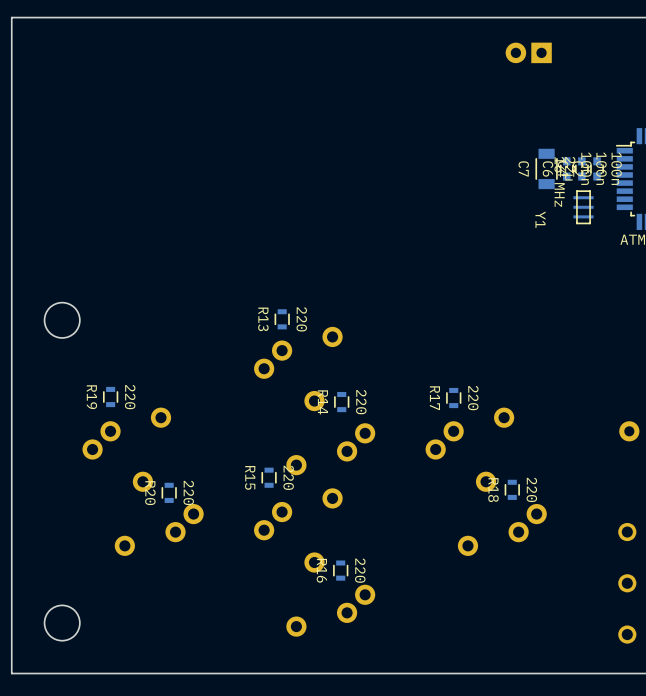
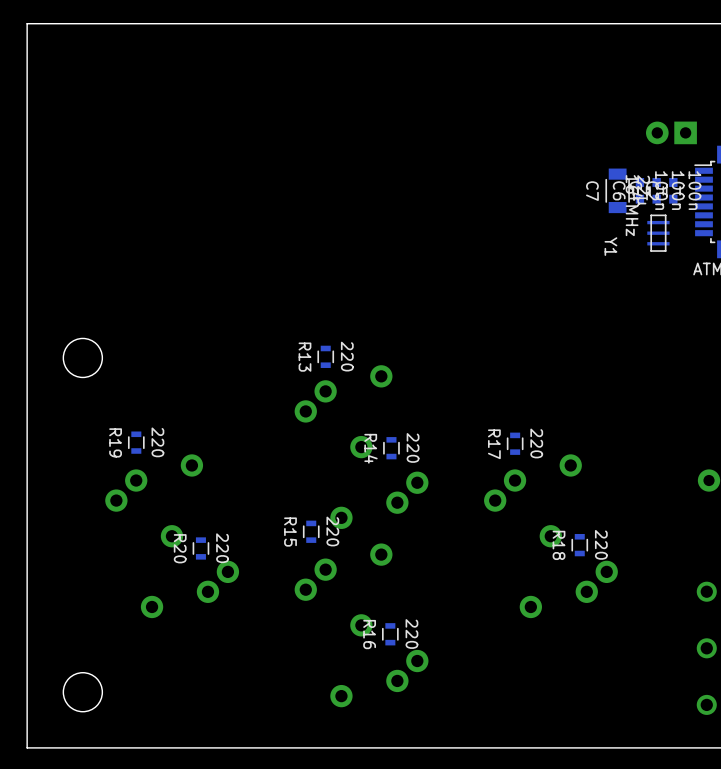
part position: (528, 52) -> (671, 132)

